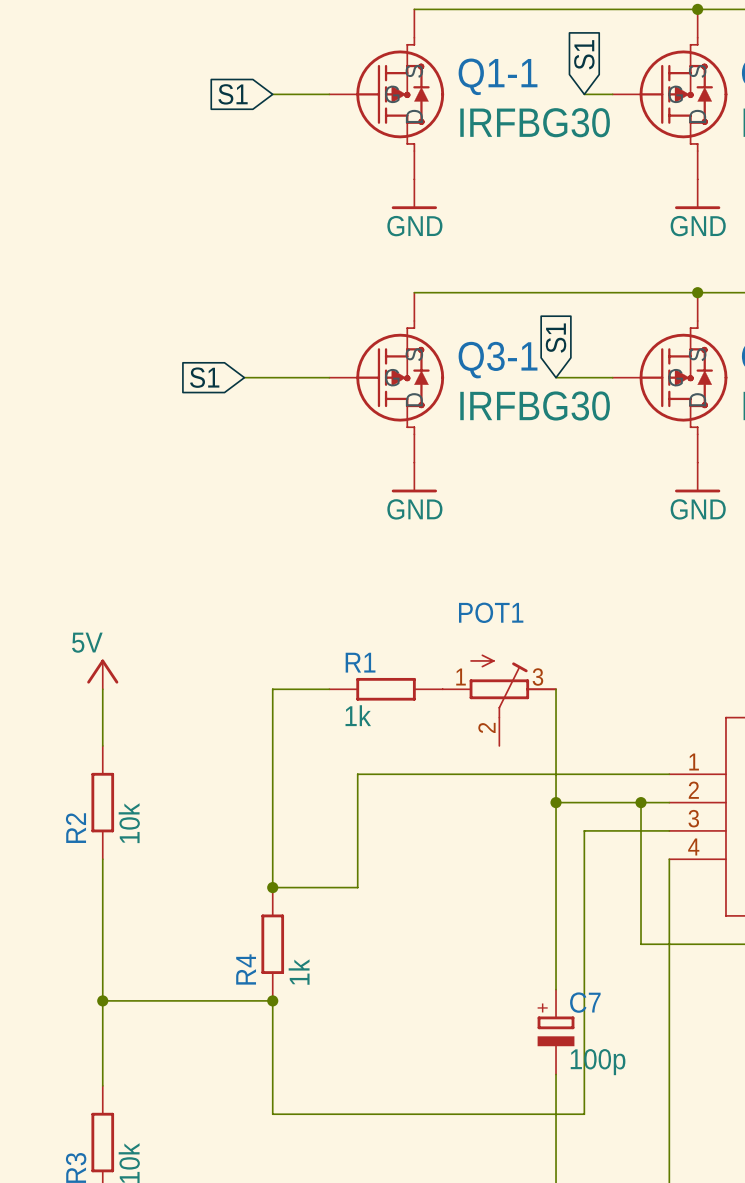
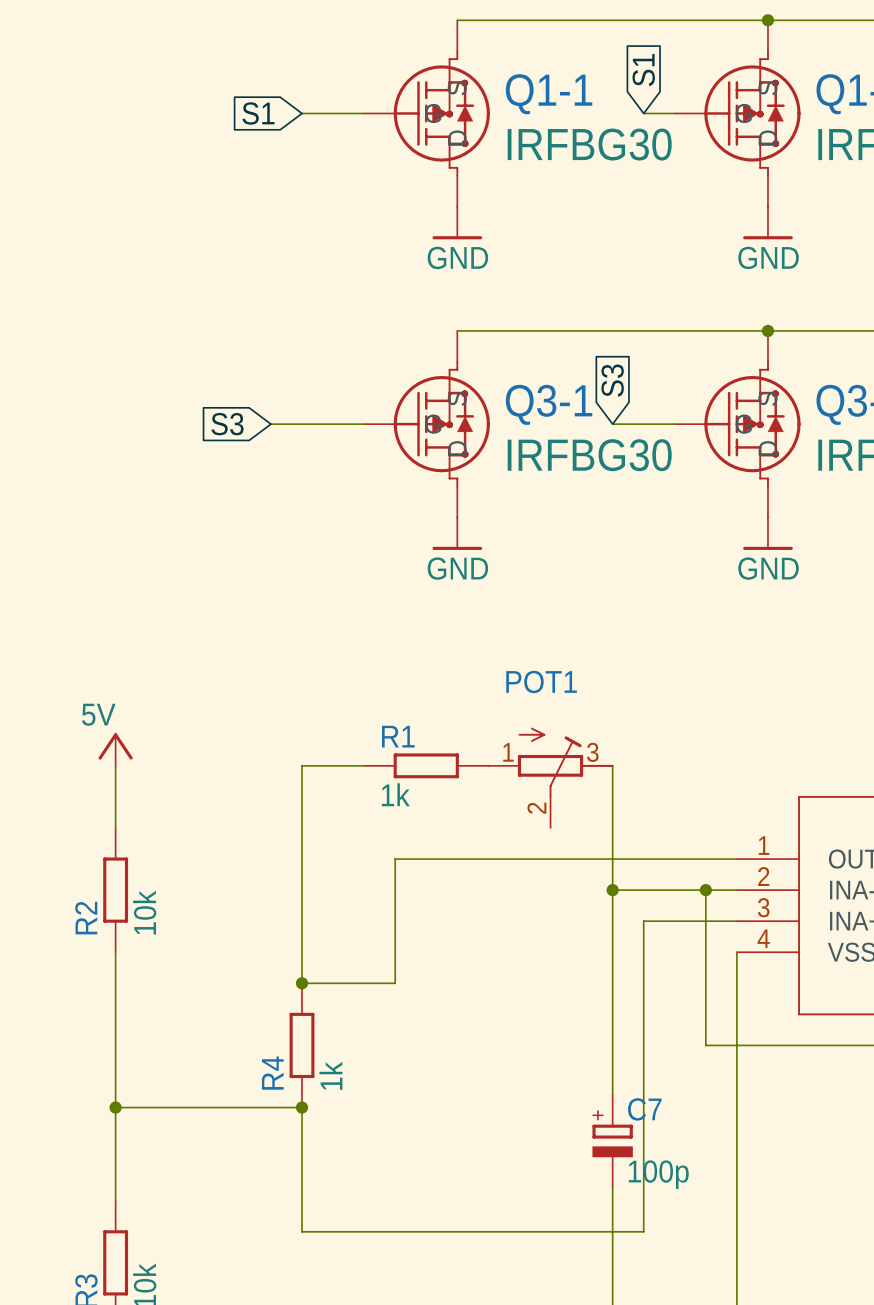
global label: S1 (556, 338) -> S3 (612, 380)
global label: S1 (204, 377) -> S3 (227, 424)

